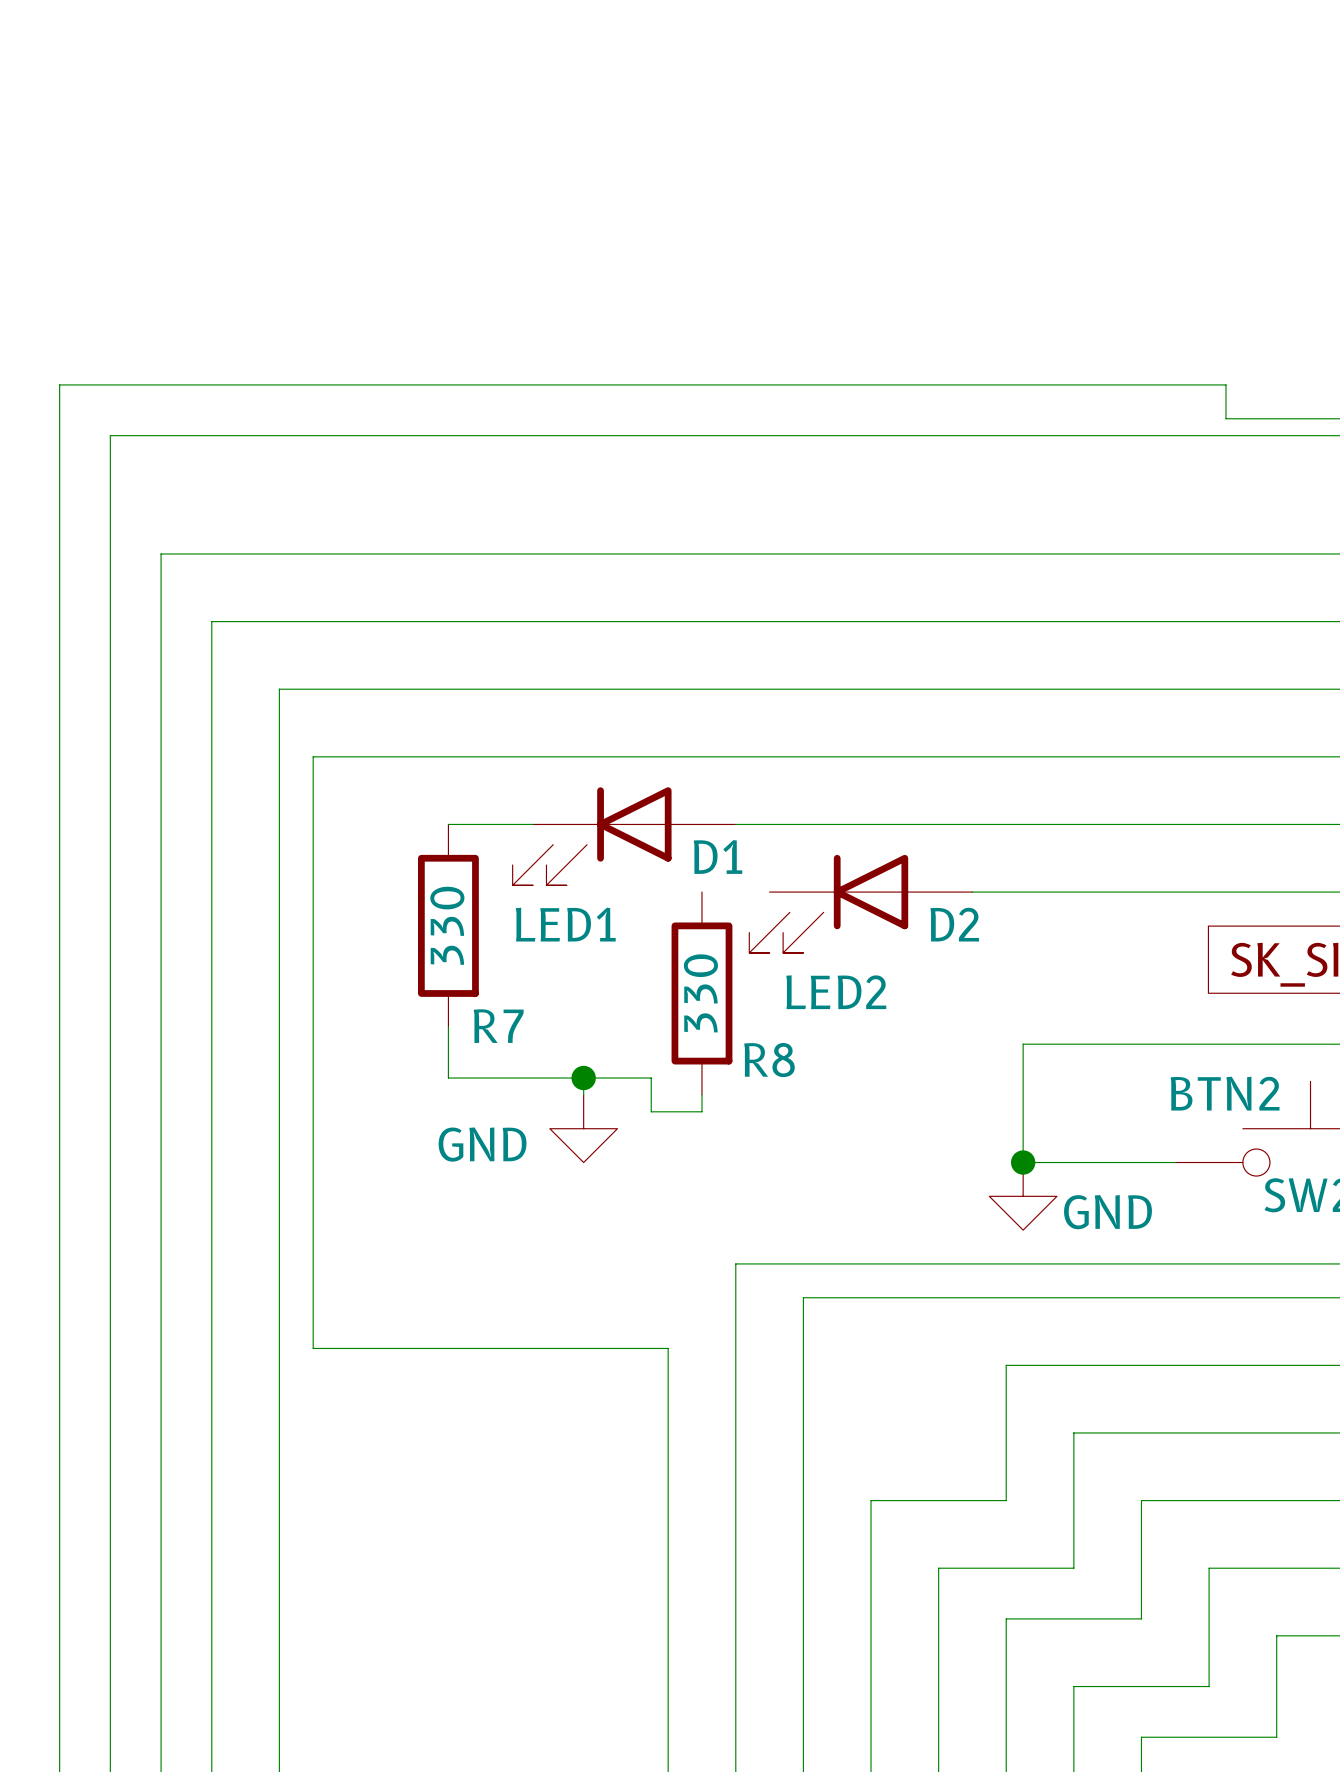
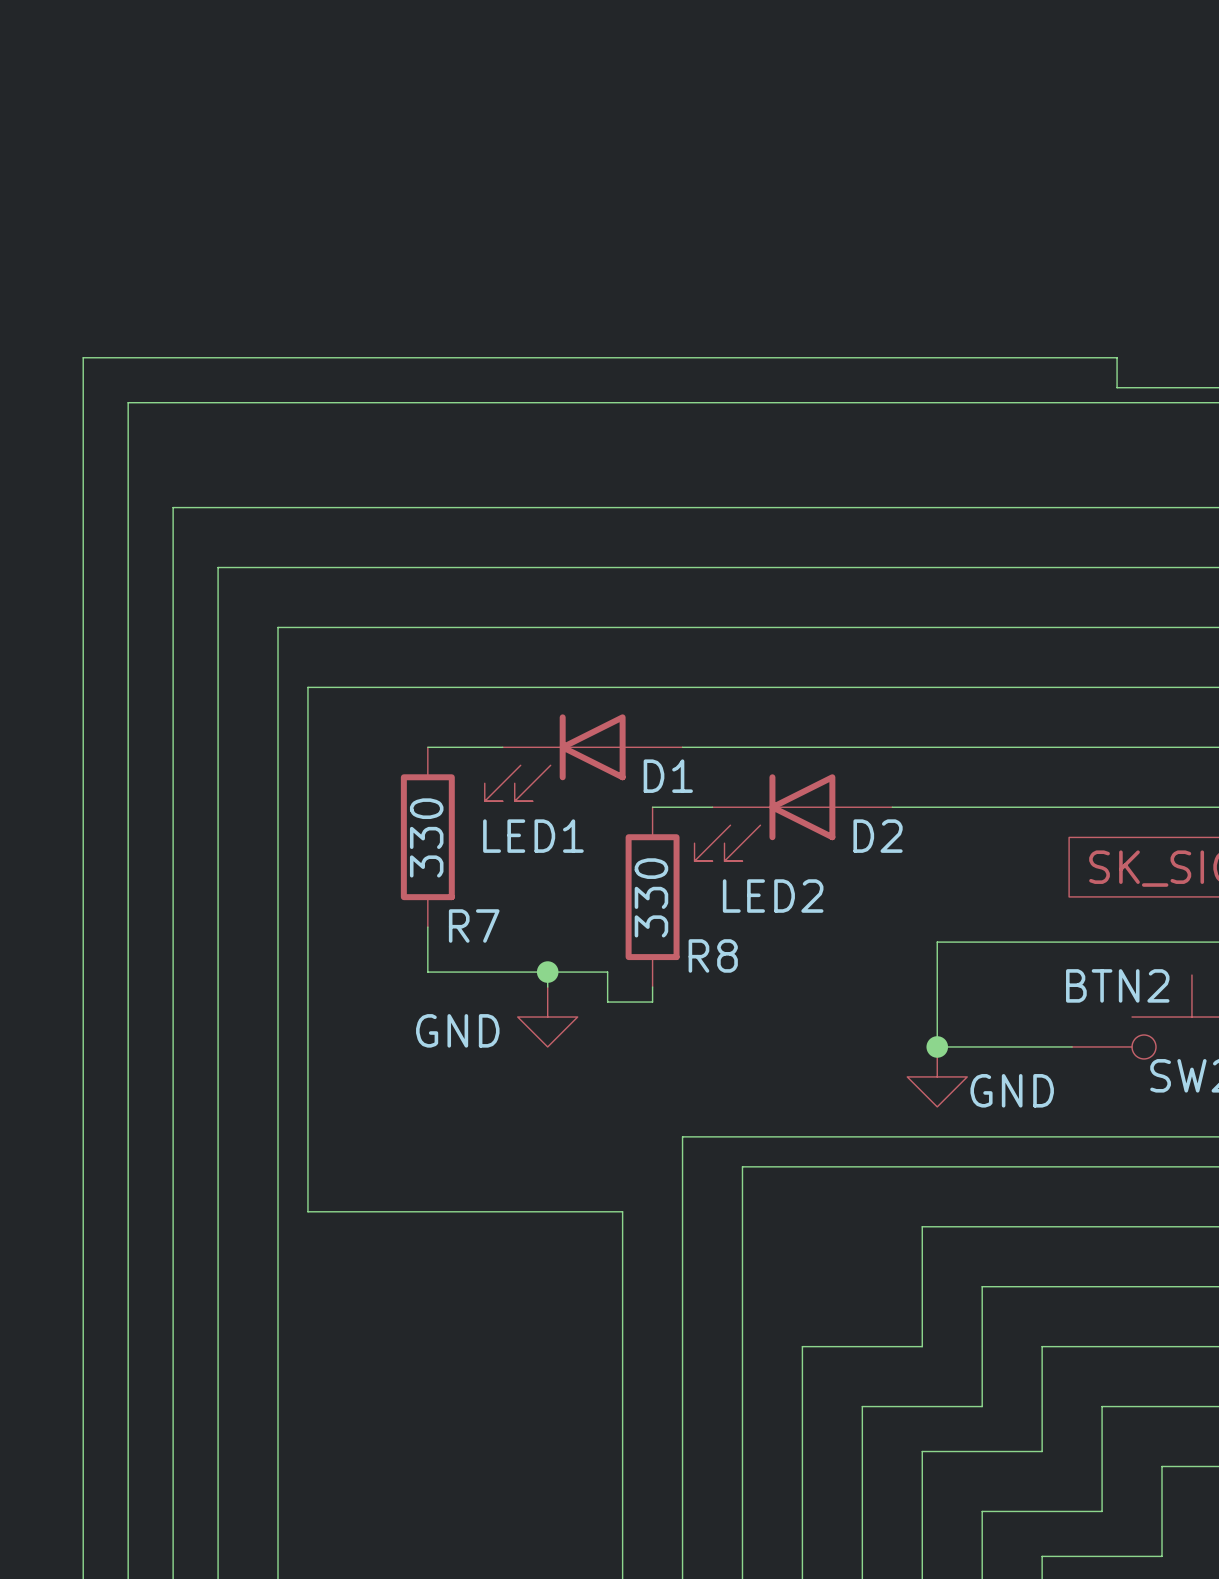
wire: none -> (652, 807) (712, 807)

